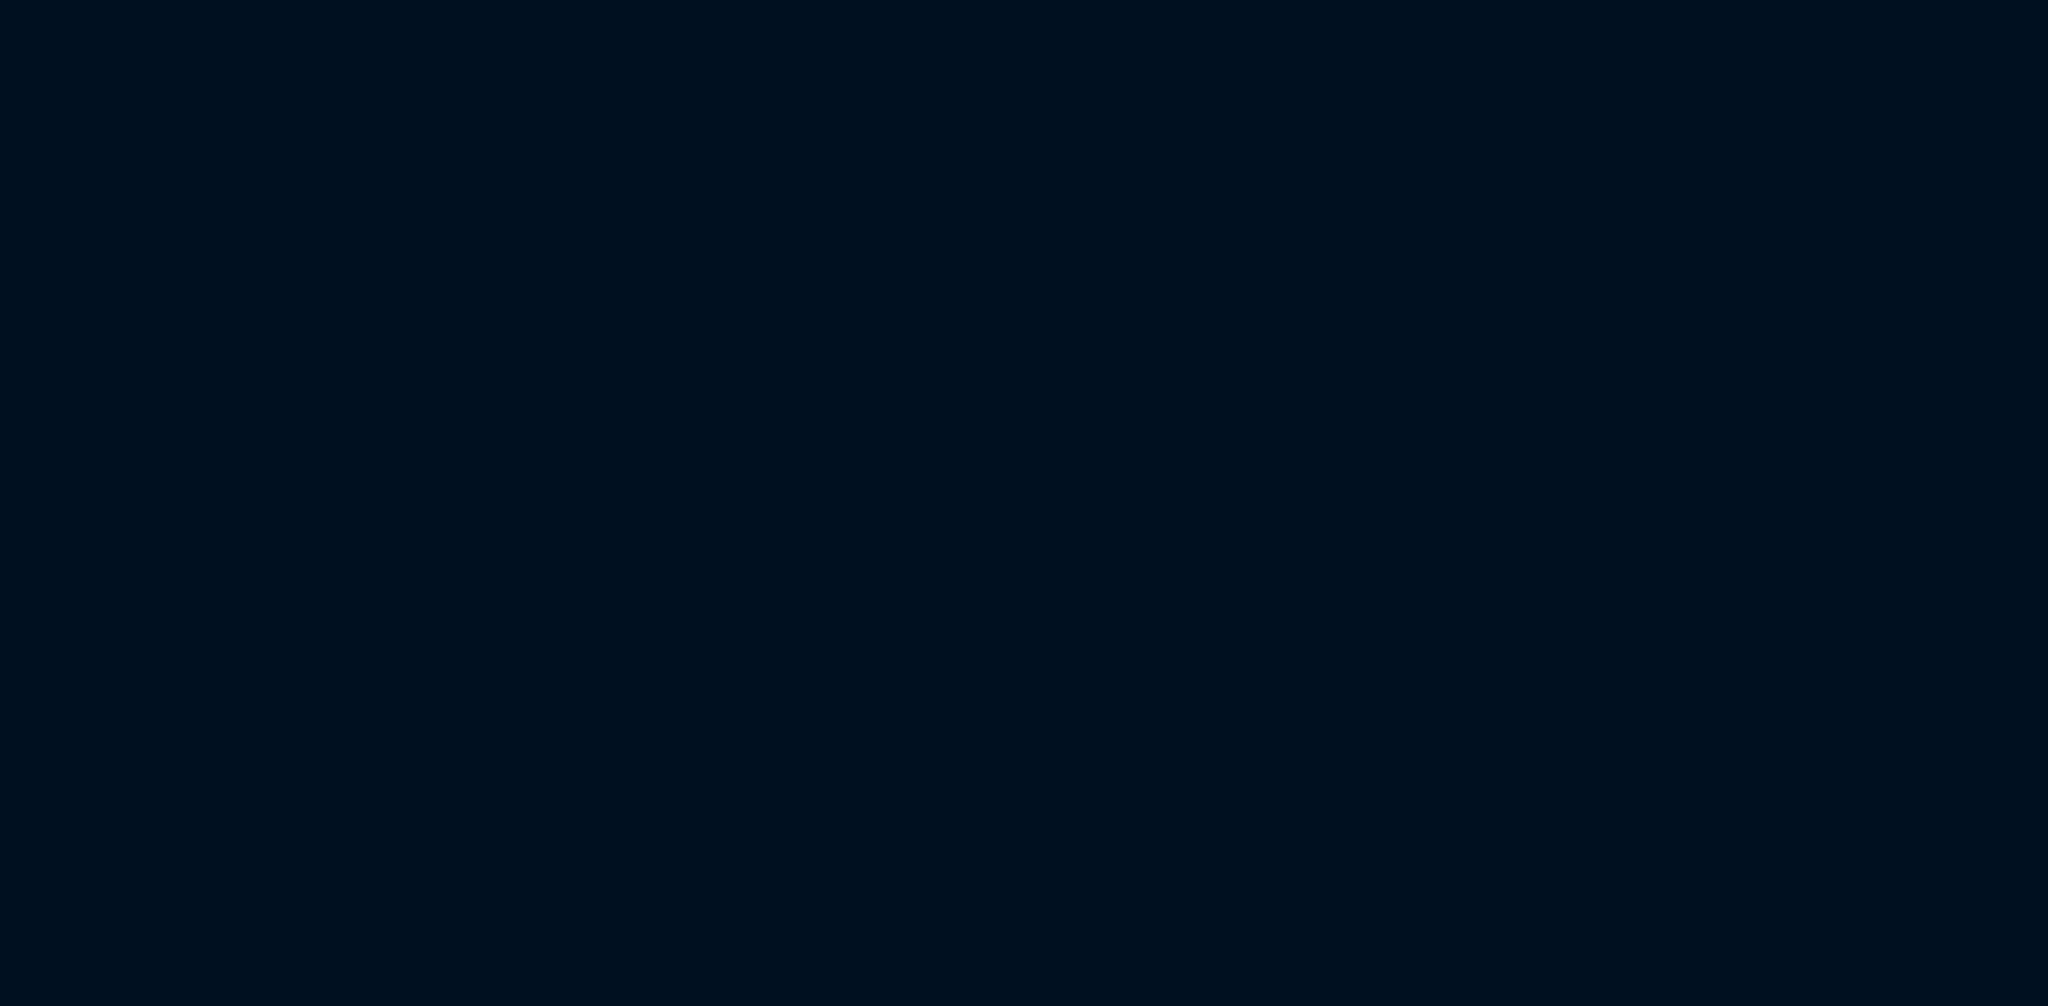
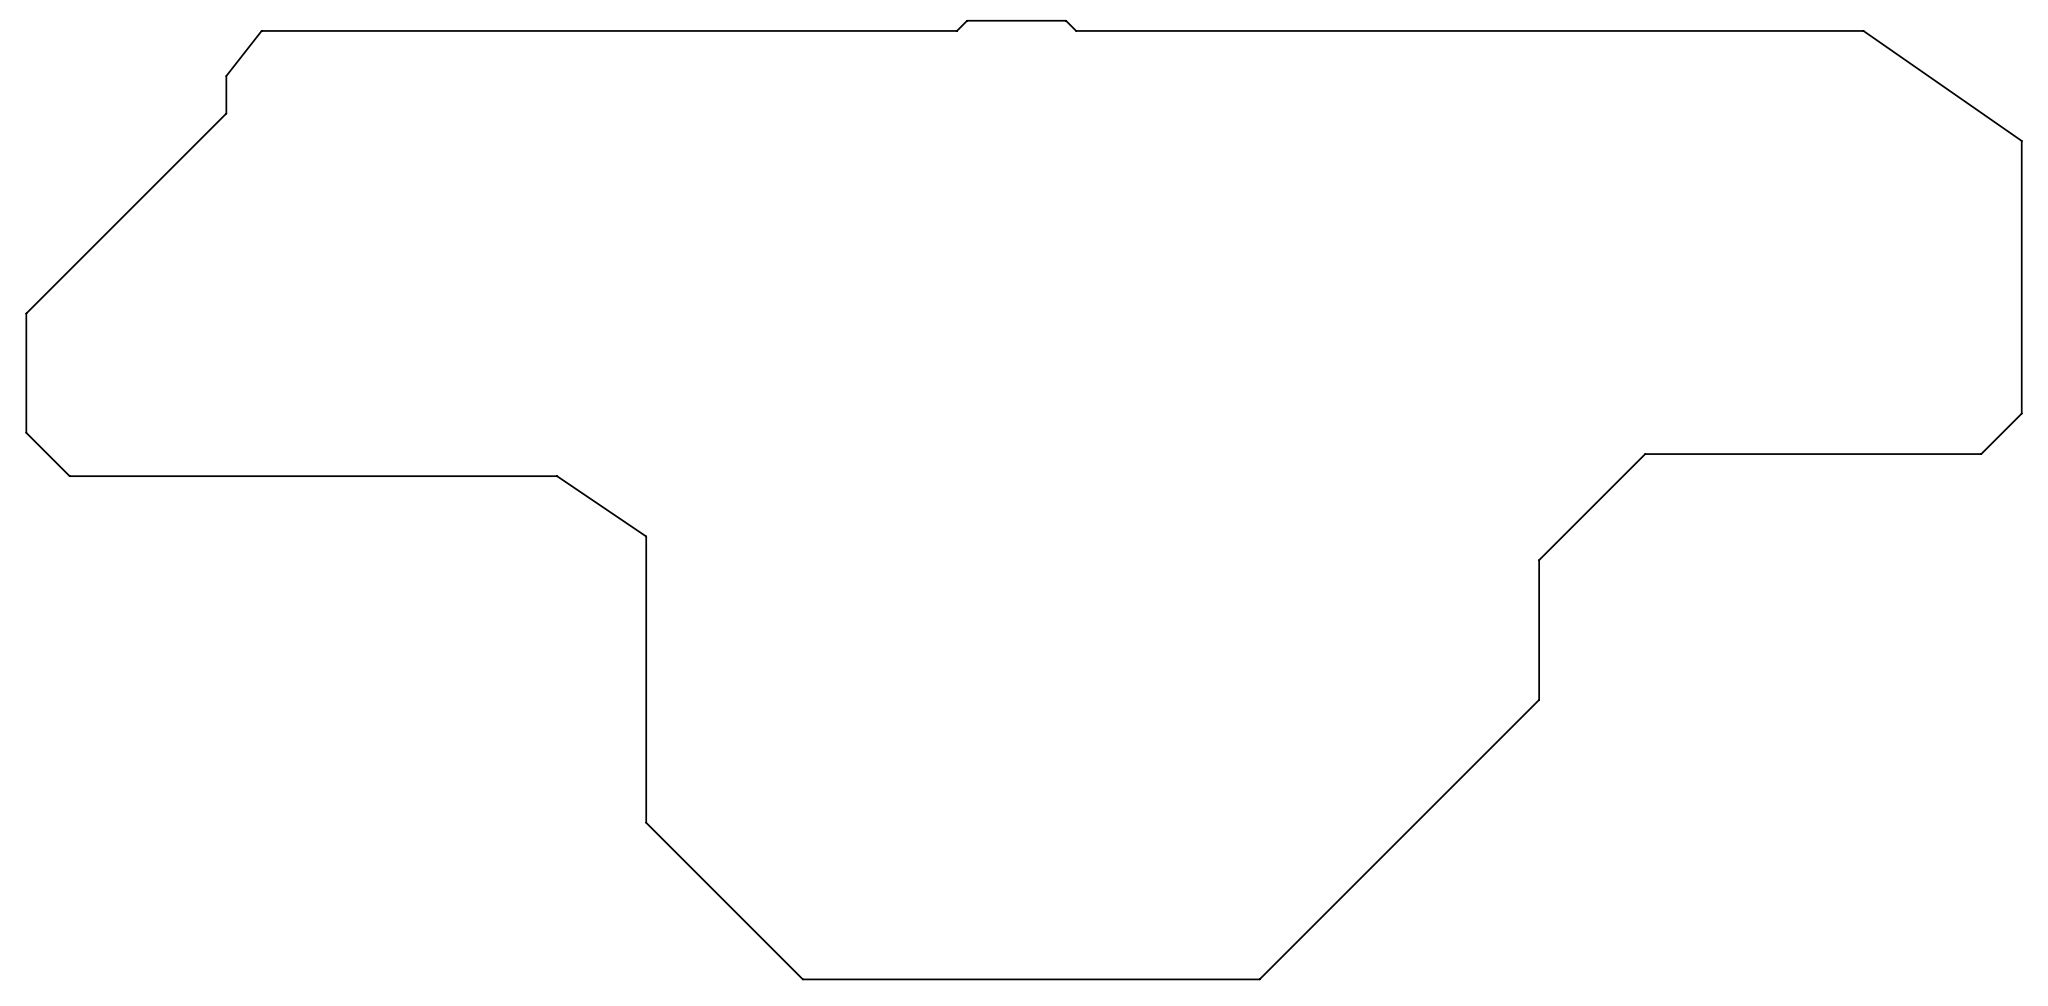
board edge: none -> (967, 20) (956, 30) (261, 30) (226, 76) (226, 113) (26, 313) (26, 432) (69, 476) (557, 476) (646, 536) (646, 822) (802, 979) (1259, 979) (1539, 699) (1539, 560) (1645, 454) (1981, 454) (2021, 413) (2021, 140) (1863, 30) (1076, 30) (1065, 20) (967, 20)

